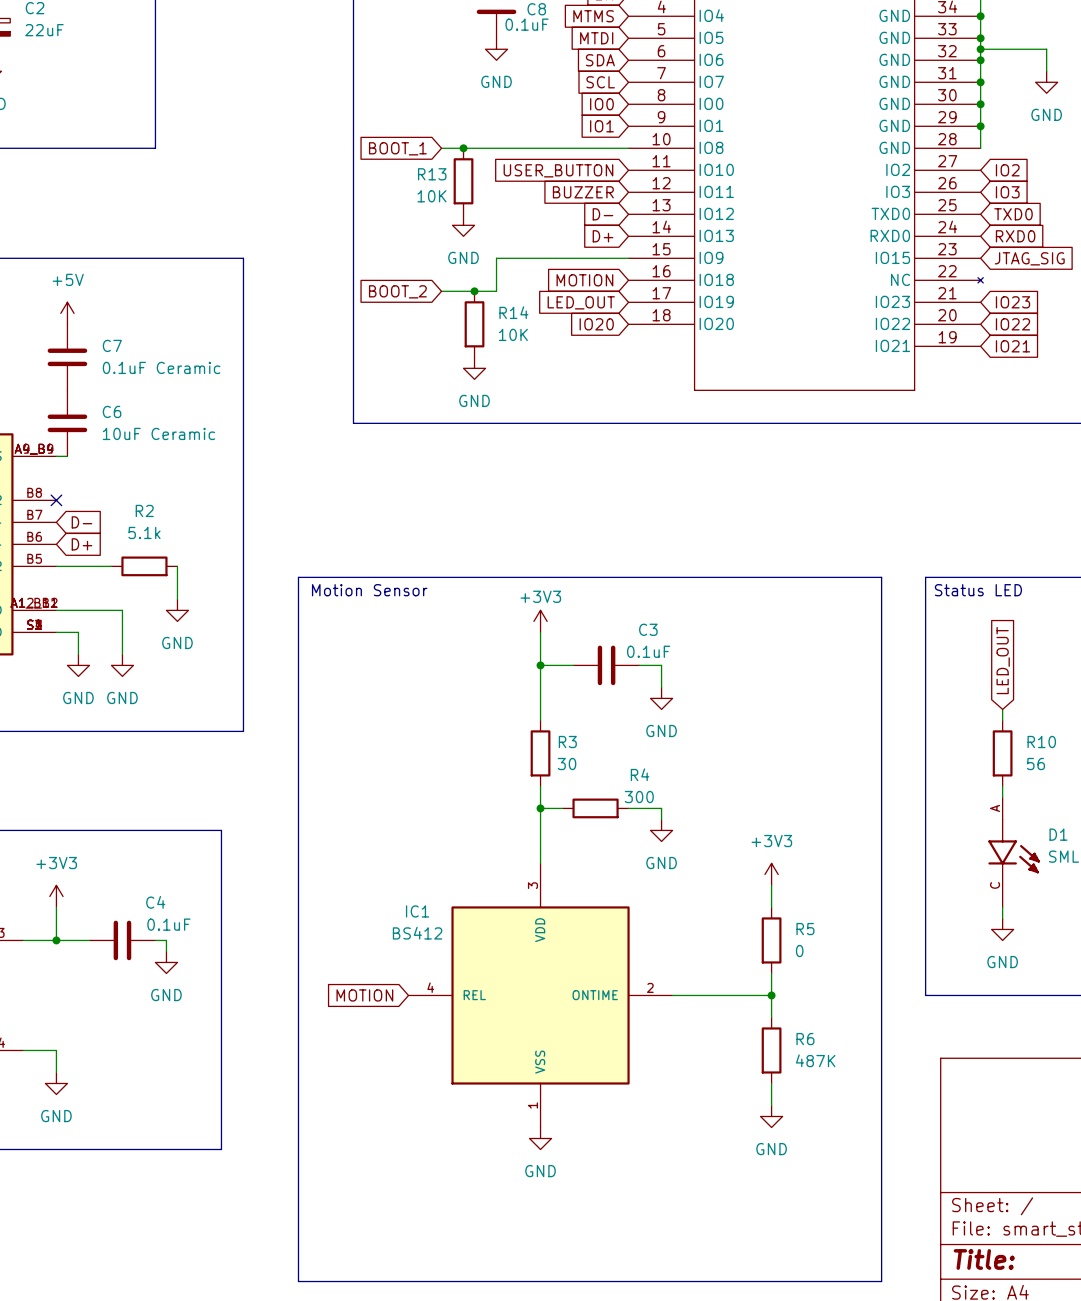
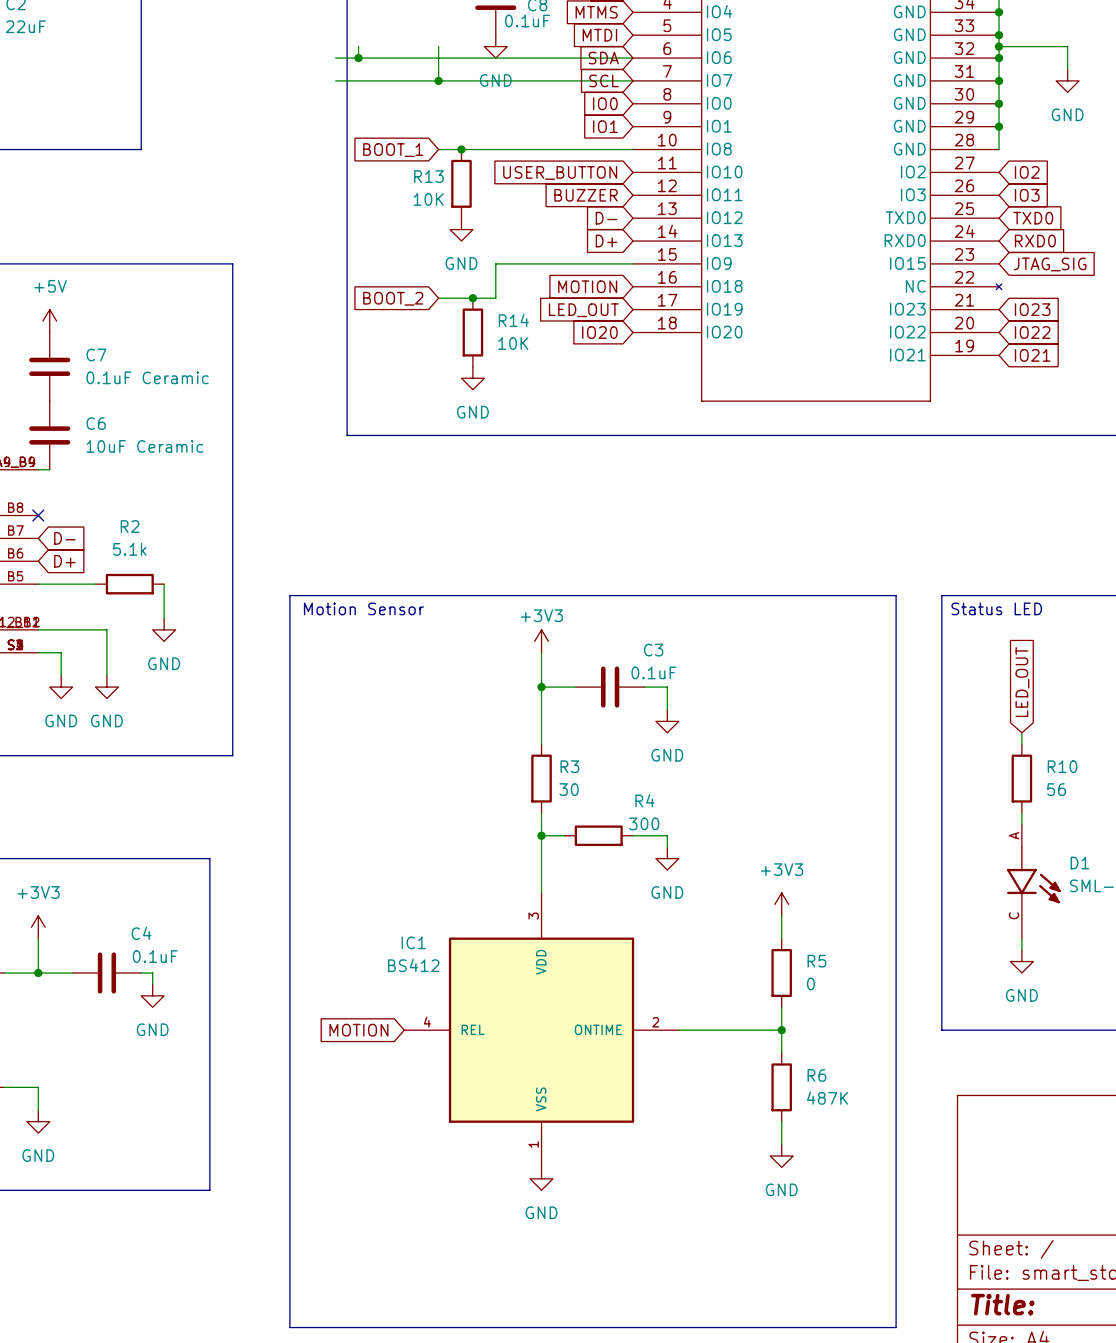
wire: none -> (358, 46) (358, 58)
wire: none -> (438, 46) (438, 80)
wire: none -> (335, 58) (633, 58)
junction: none -> (358, 58)
wire: none -> (335, 80) (633, 80)
junction: none -> (438, 80)

